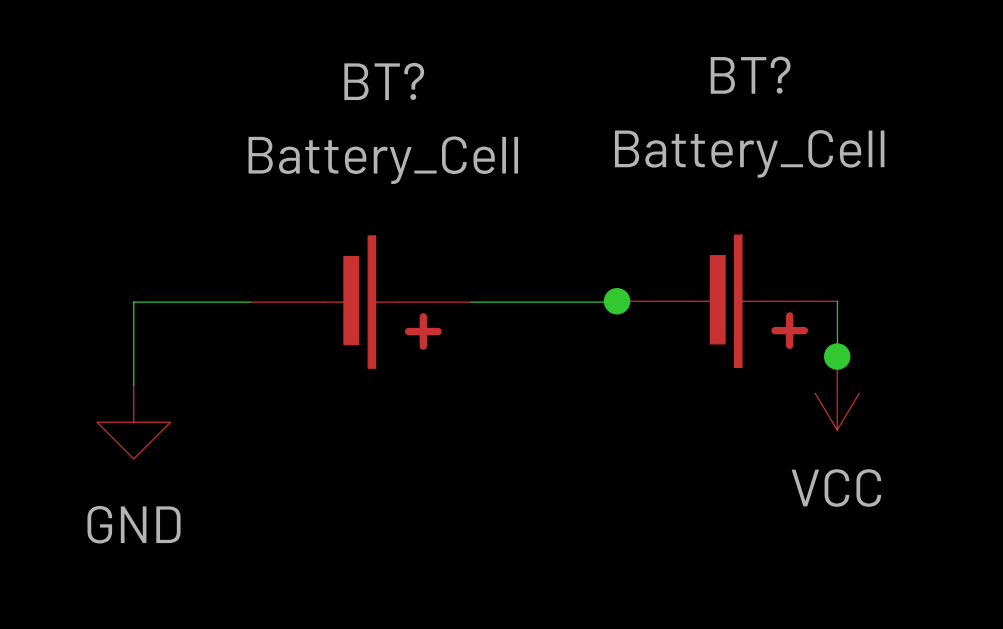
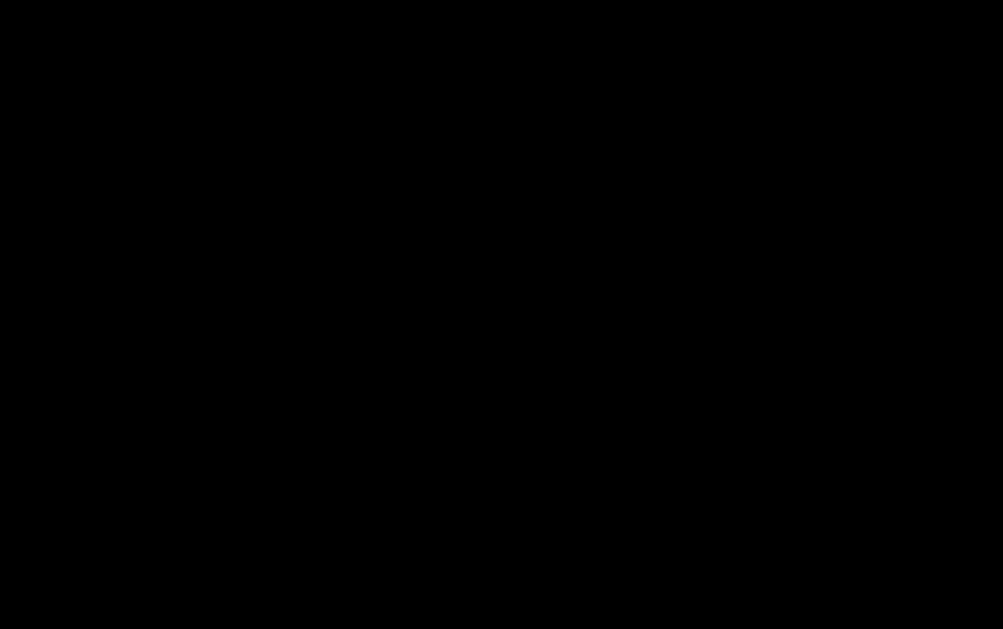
wire: (617, 301) (471, 302) -> none
junction: (617, 301) -> none
BT?: Battery_Cell (727, 301) -> none
wire: (837, 301) (837, 356) -> none
wire: (250, 302) (133, 302) (133, 385) -> none
BT?: Battery_Cell (360, 302) -> none
junction: (837, 356) -> none
power symbol: VCC (837, 393) -> none
power symbol: GND (133, 422) -> none

